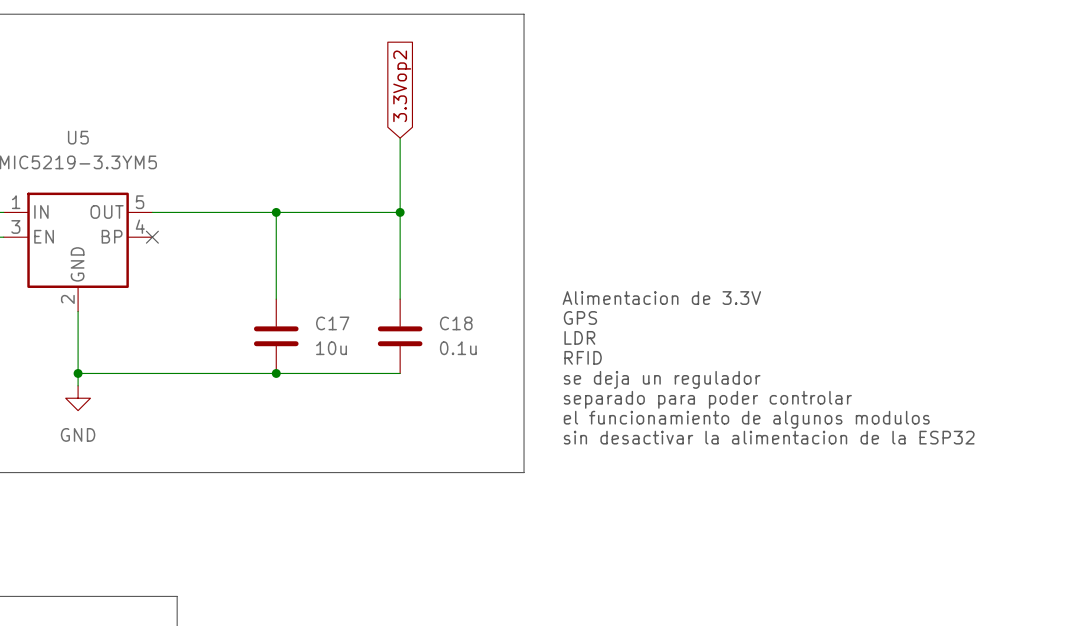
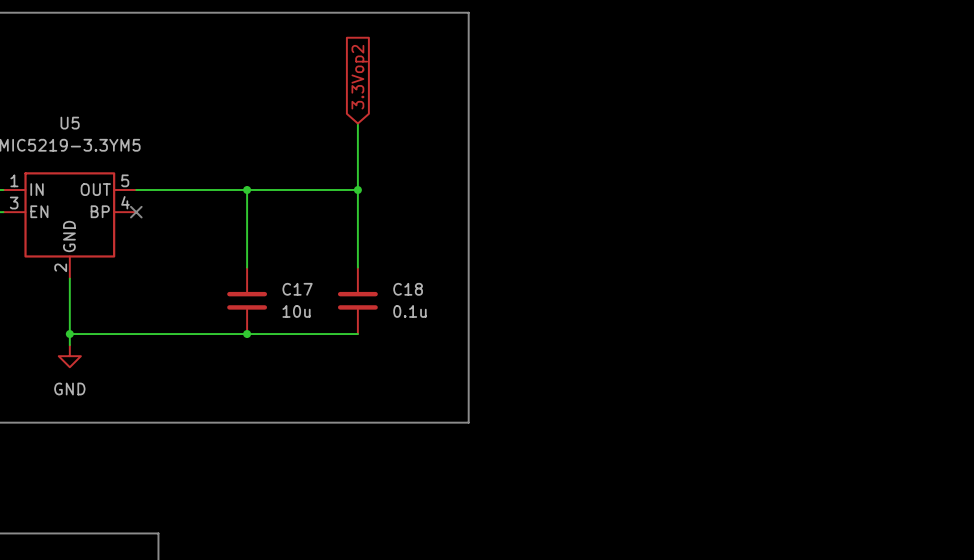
text: Alimentacion de 3.3V (661, 298) -> none
text: GPS (580, 317) -> none
text: LDR (579, 337) -> none
text: RFID (583, 357) -> none
text: se deja un regulador (662, 379) -> none
text: separado para poder controlar (707, 399) -> none
text: el funcionamiento de algunos modulos (746, 419) -> none
text: sin desactivar la alimentacion de la ESP32 (769, 437) -> none

